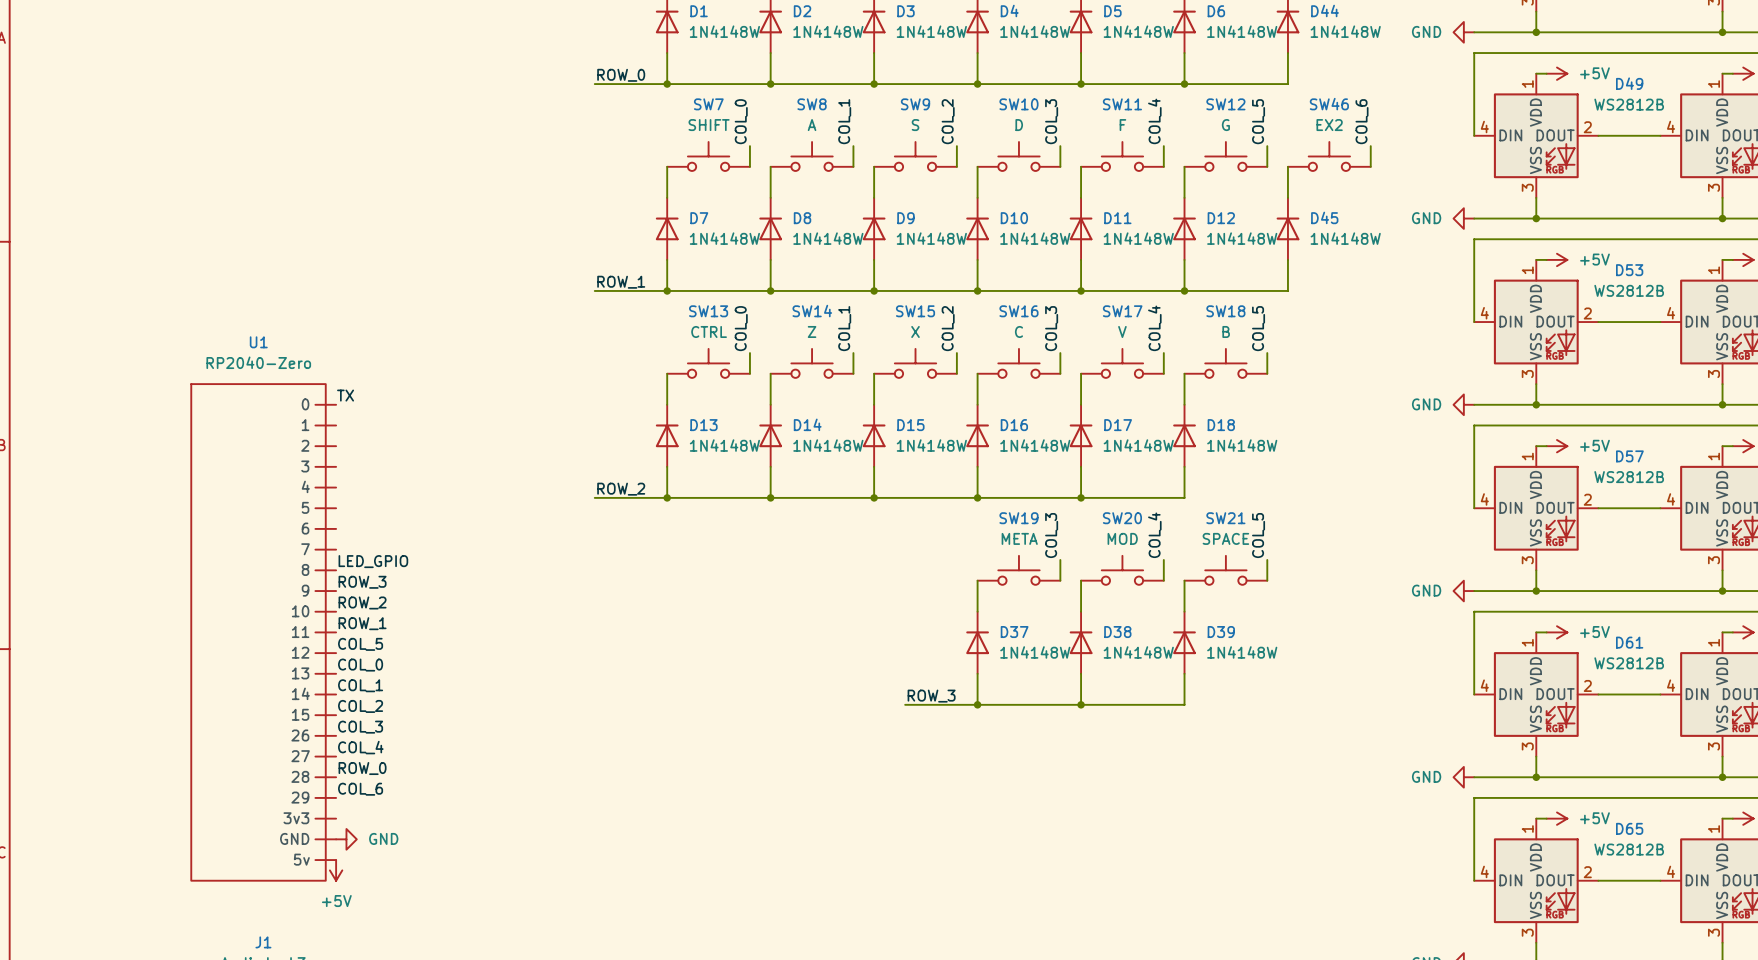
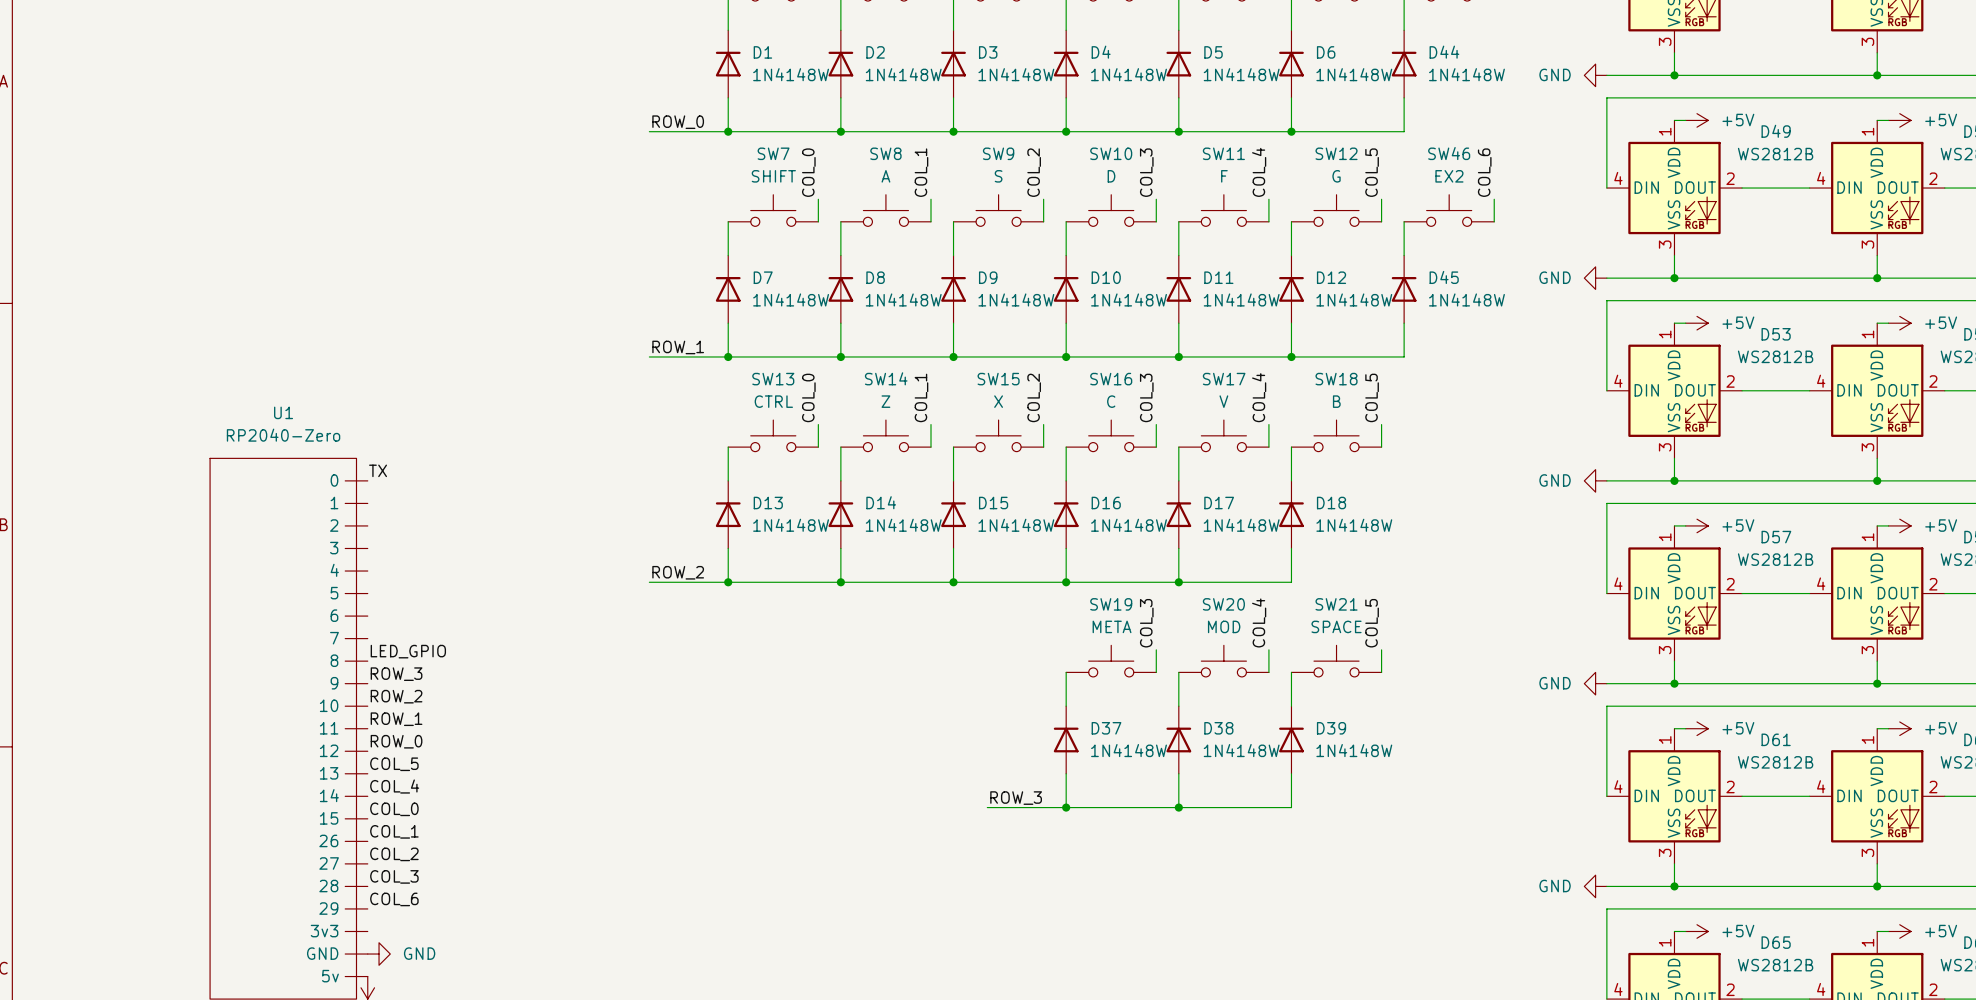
label: COL_5 (360, 644) -> ROW_0 (396, 741)
label: COL_0 (360, 665) -> COL_5 (394, 764)
label: COL_1 (360, 685) -> COL_4 (394, 786)
label: COL_2 (360, 706) -> COL_0 (394, 809)
label: COL_3 (360, 727) -> COL_1 (394, 831)
label: COL_4 (360, 747) -> COL_2 (394, 854)
label: ROW_0 (362, 768) -> COL_3 (394, 876)

